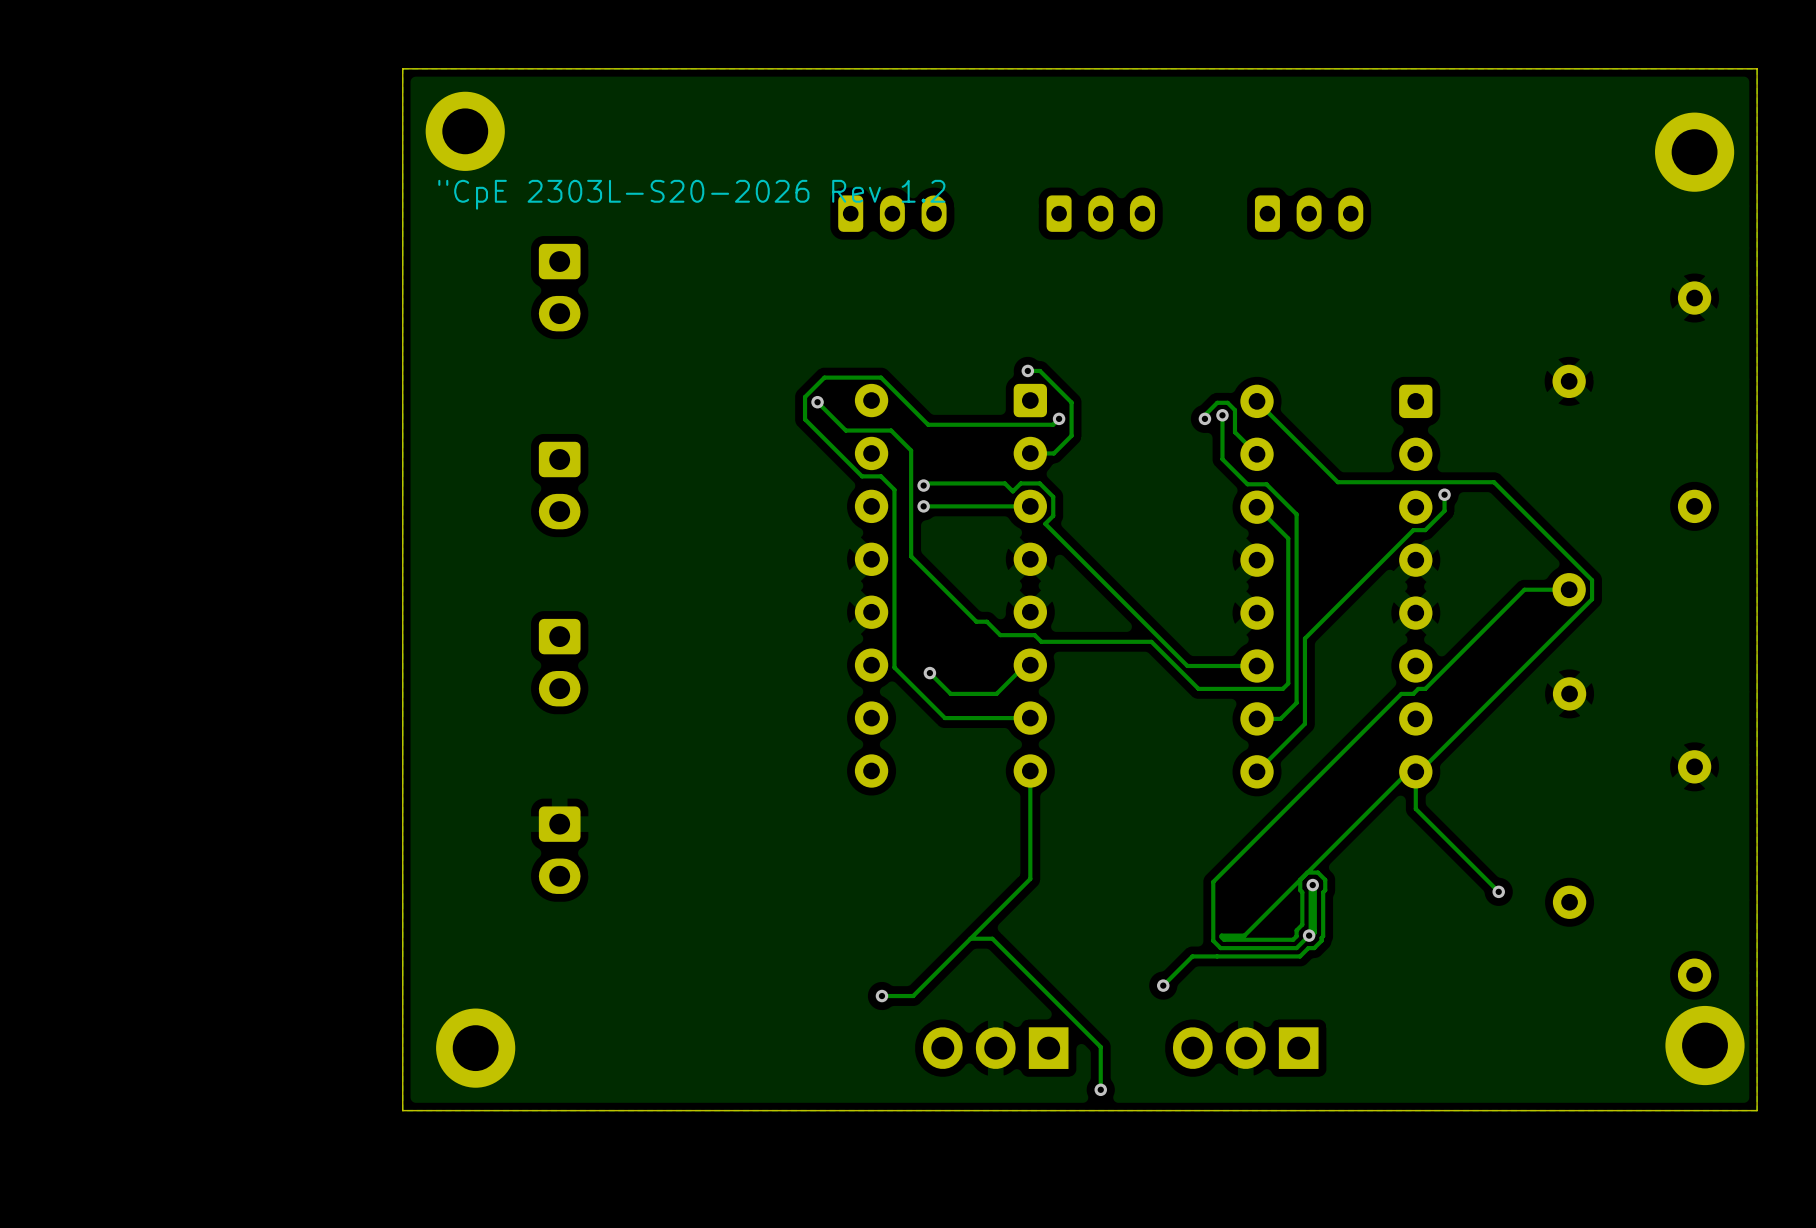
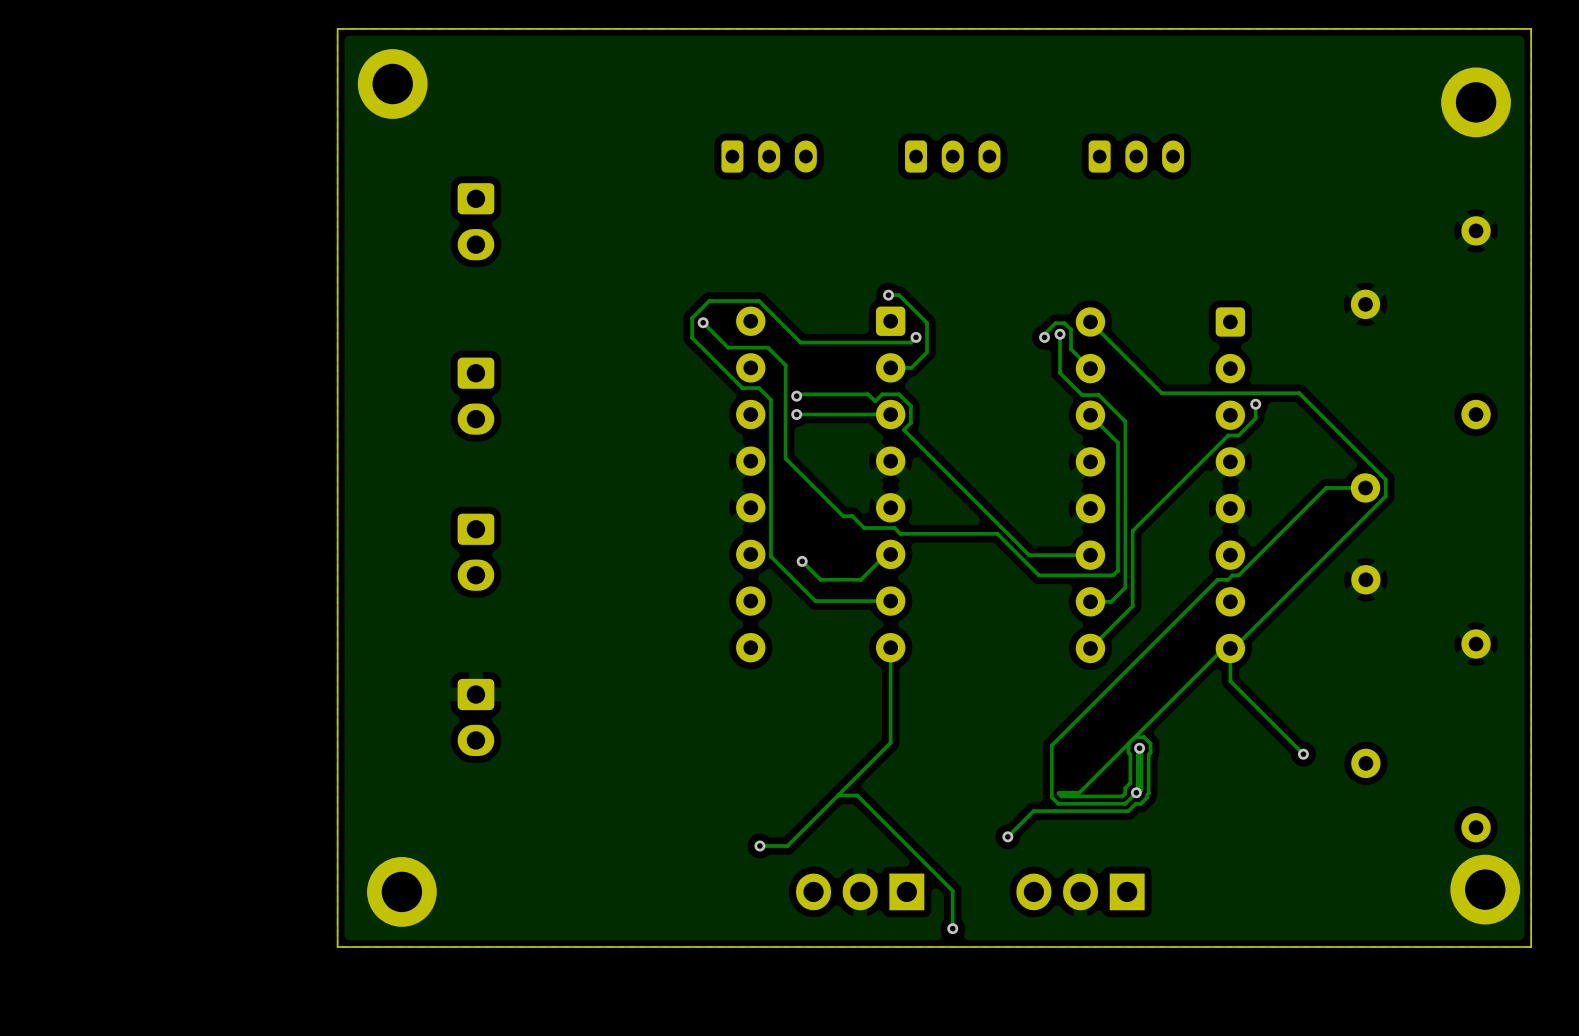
text: "CpE 2303L-S20-2026 Rev 1.2 (691, 194) -> none

